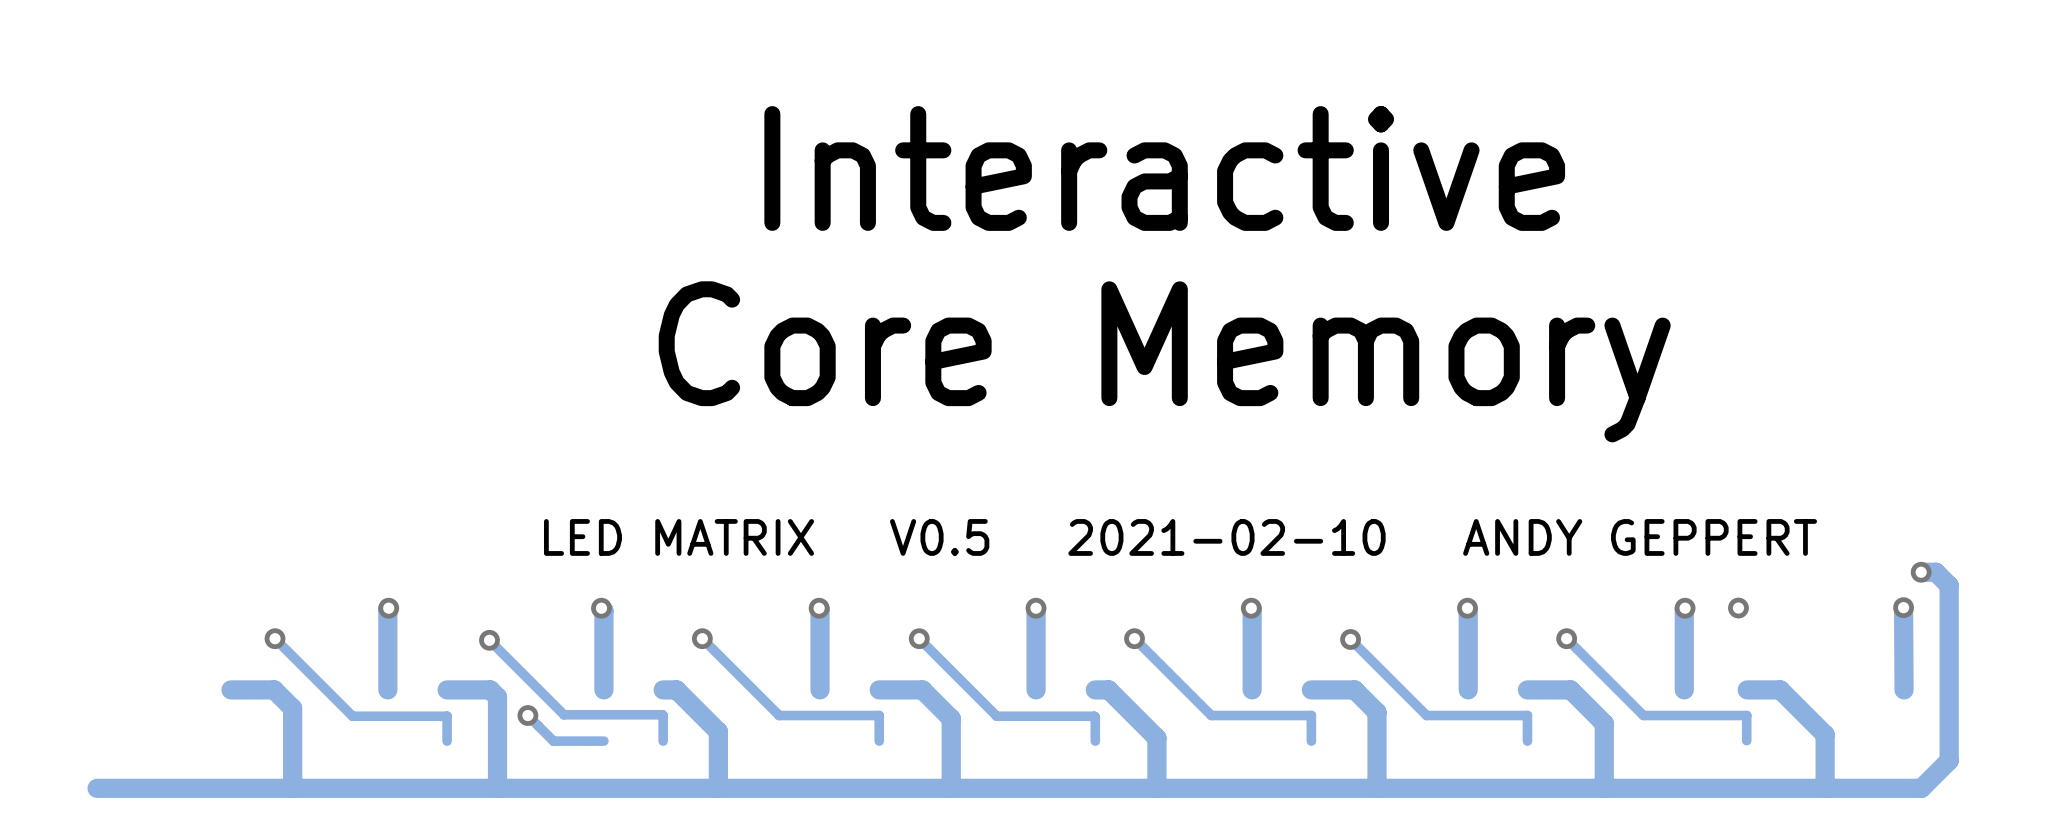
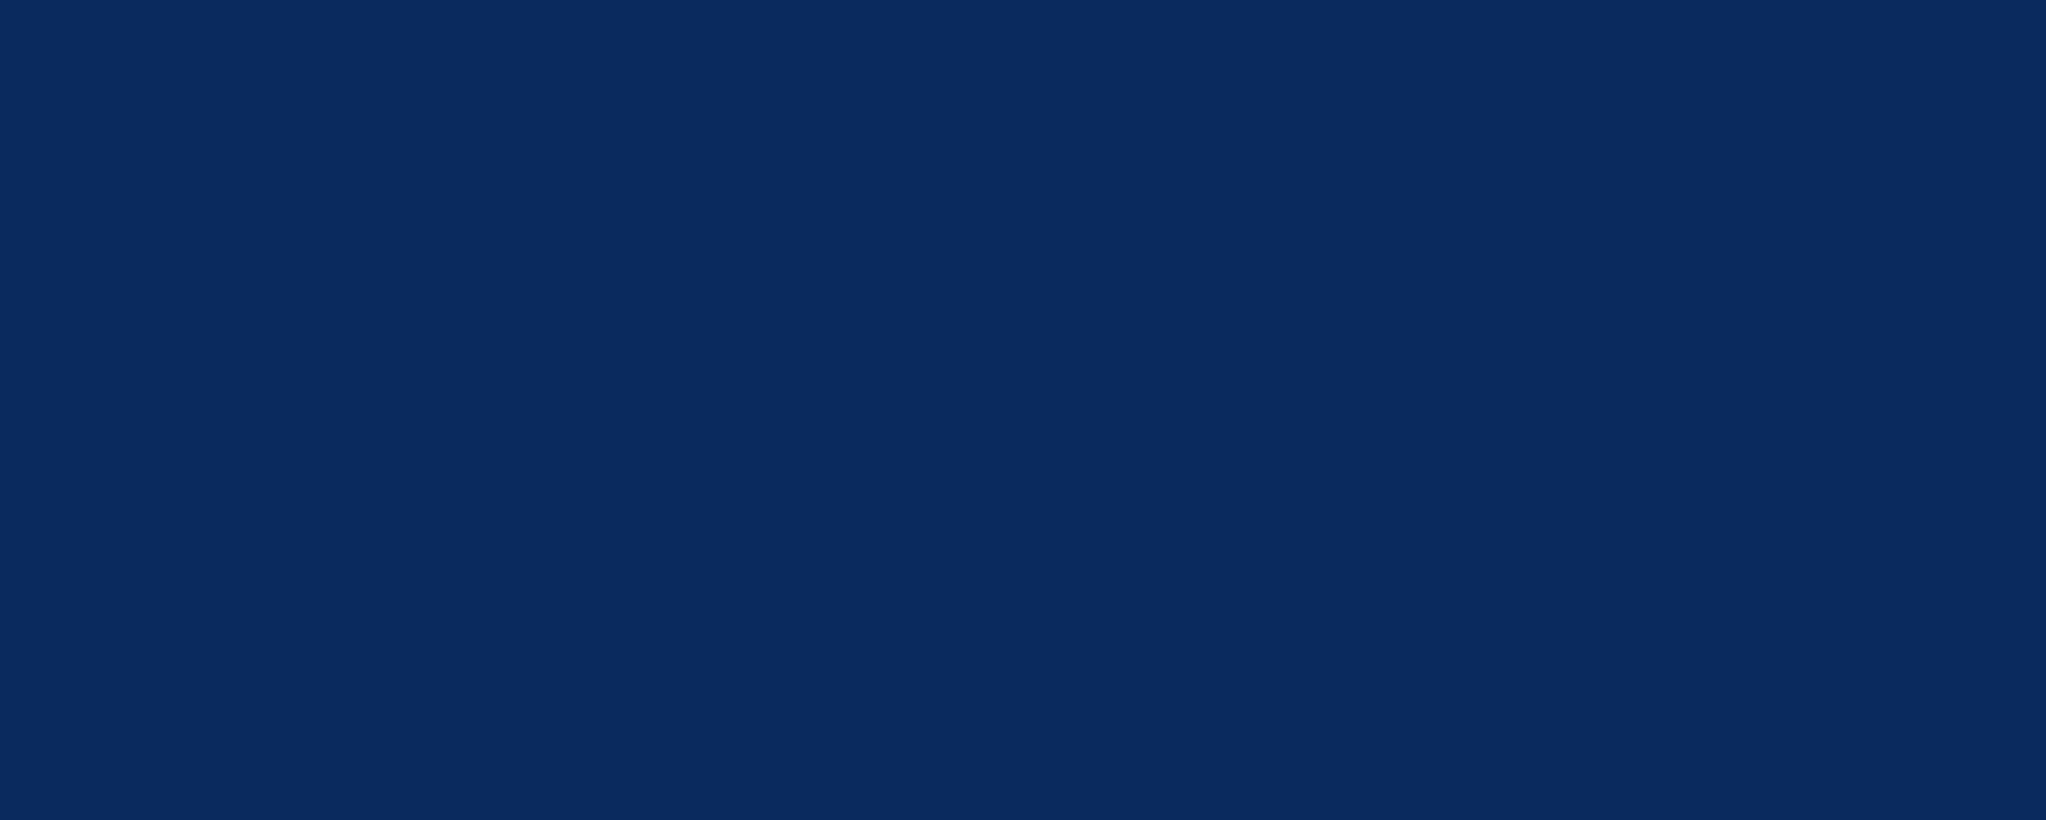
text: Interactive (1164, 168) -> none
text: Core Memory (1164, 361) -> none
text: LED MATRIX V0.5 2021-02-10 ANDY GEPPERT (1180, 537) -> none
track: (1921, 572) (1935, 572) (1949, 585) (1949, 760) (1921, 788) (97, 788) -> none
via: (1921, 572) -> none
track: (1903, 607) (1904, 689) -> none
via: (1903, 607) -> none
track: (388, 608) (387, 689) -> none
via: (388, 608) -> none
track: (601, 608) (603, 610) (603, 689) -> none
via: (601, 608) -> none
track: (819, 608) (820, 689) -> none
via: (819, 608) -> none
track: (1036, 608) (1036, 689) -> none
via: (1036, 608) -> none
track: (1251, 608) (1252, 689) -> none
via: (1251, 608) -> none
via: (1467, 608) -> none
track: (1468, 608) (1468, 689) -> none
track: (1685, 608) (1684, 689) -> none
via: (1685, 608) -> none
via: (1738, 608) -> none
track: (275, 638) (352, 716) (447, 716) -> none
via: (275, 638) -> none
track: (702, 638) (779, 715) (879, 715) (879, 741) -> none
via: (702, 638) -> none
track: (919, 638) (996, 716) (1094, 716) (1095, 741) -> none
via: (919, 638) -> none
track: (1134, 638) (1211, 715) (1311, 715) (1311, 741) -> none
via: (1134, 638) -> none
track: (1566, 638) (1643, 715) (1746, 715) (1746, 740) -> none
via: (1566, 638) -> none
track: (1350, 639) (1426, 715) (1527, 715) (1527, 741) -> none
via: (1350, 639) -> none
track: (489, 640) (563, 714) (662, 714) (663, 741) -> none
via: (489, 640) -> none
track: (231, 689) (274, 689) (292, 708) (292, 788) -> none
track: (447, 689) (490, 689) (497, 697) (497, 788) -> none
track: (663, 689) (676, 689) (718, 731) (718, 788) -> none
track: (879, 689) (922, 689) (951, 718) (951, 788) -> none
track: (1095, 689) (1108, 689) (1156, 738) (1156, 788) -> none
track: (1311, 689) (1354, 689) (1376, 712) (1376, 788) -> none
track: (1527, 689) (1570, 689) (1604, 723) (1604, 788) -> none
track: (1747, 689) (1780, 689) (1825, 734) (1825, 788) -> none
track: (527, 715) (553, 741) (603, 741) -> none
via: (527, 715) -> none
track: (447, 716) (447, 741) -> none

